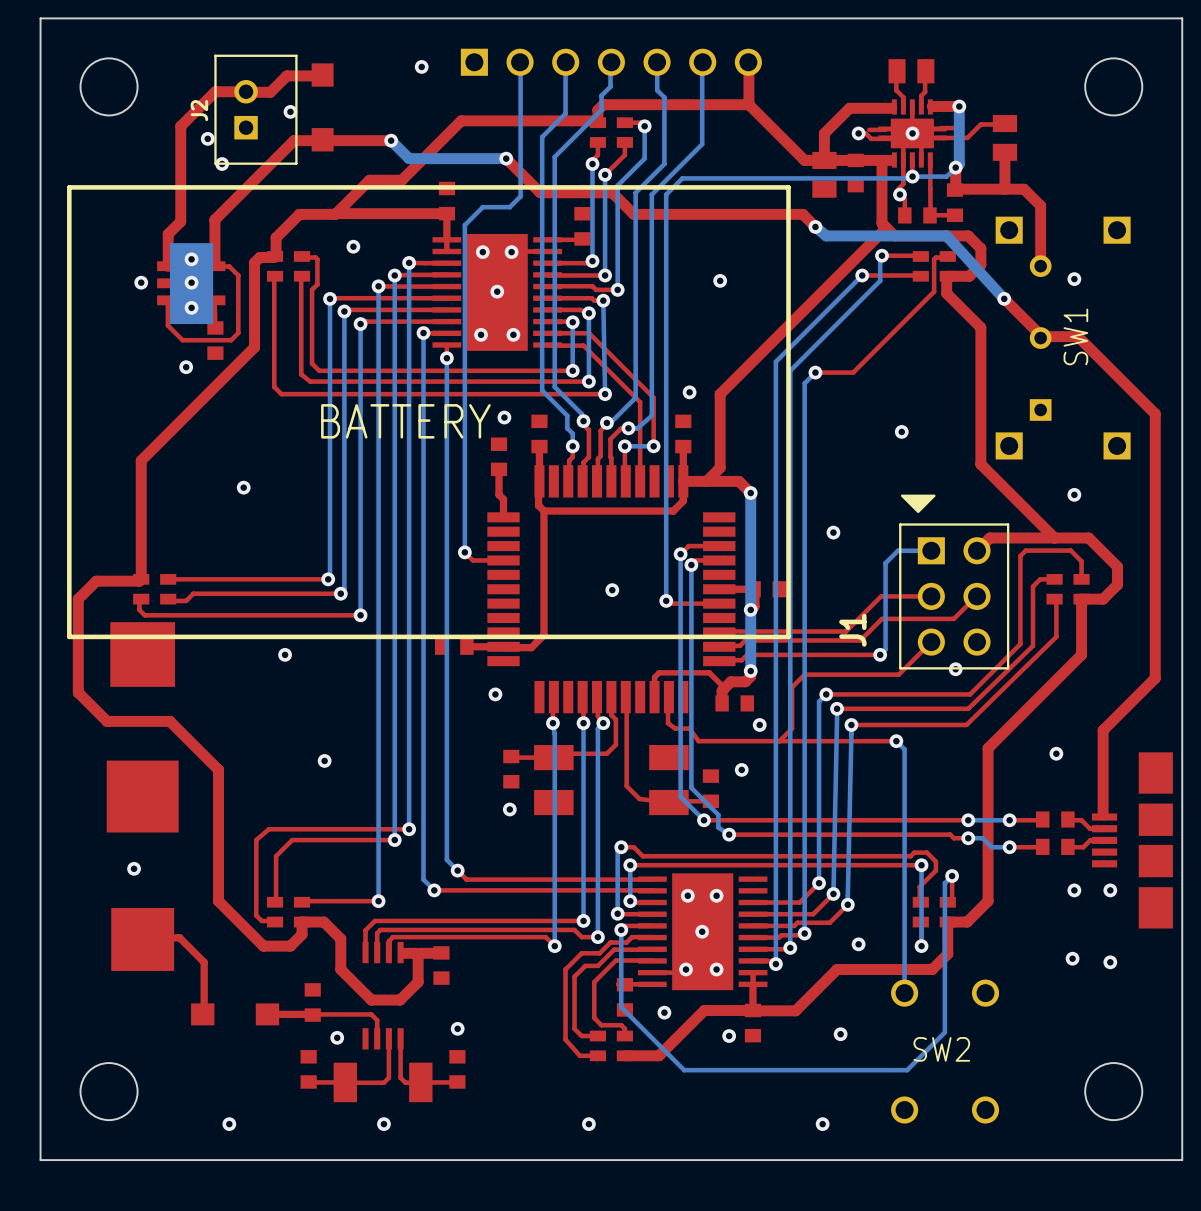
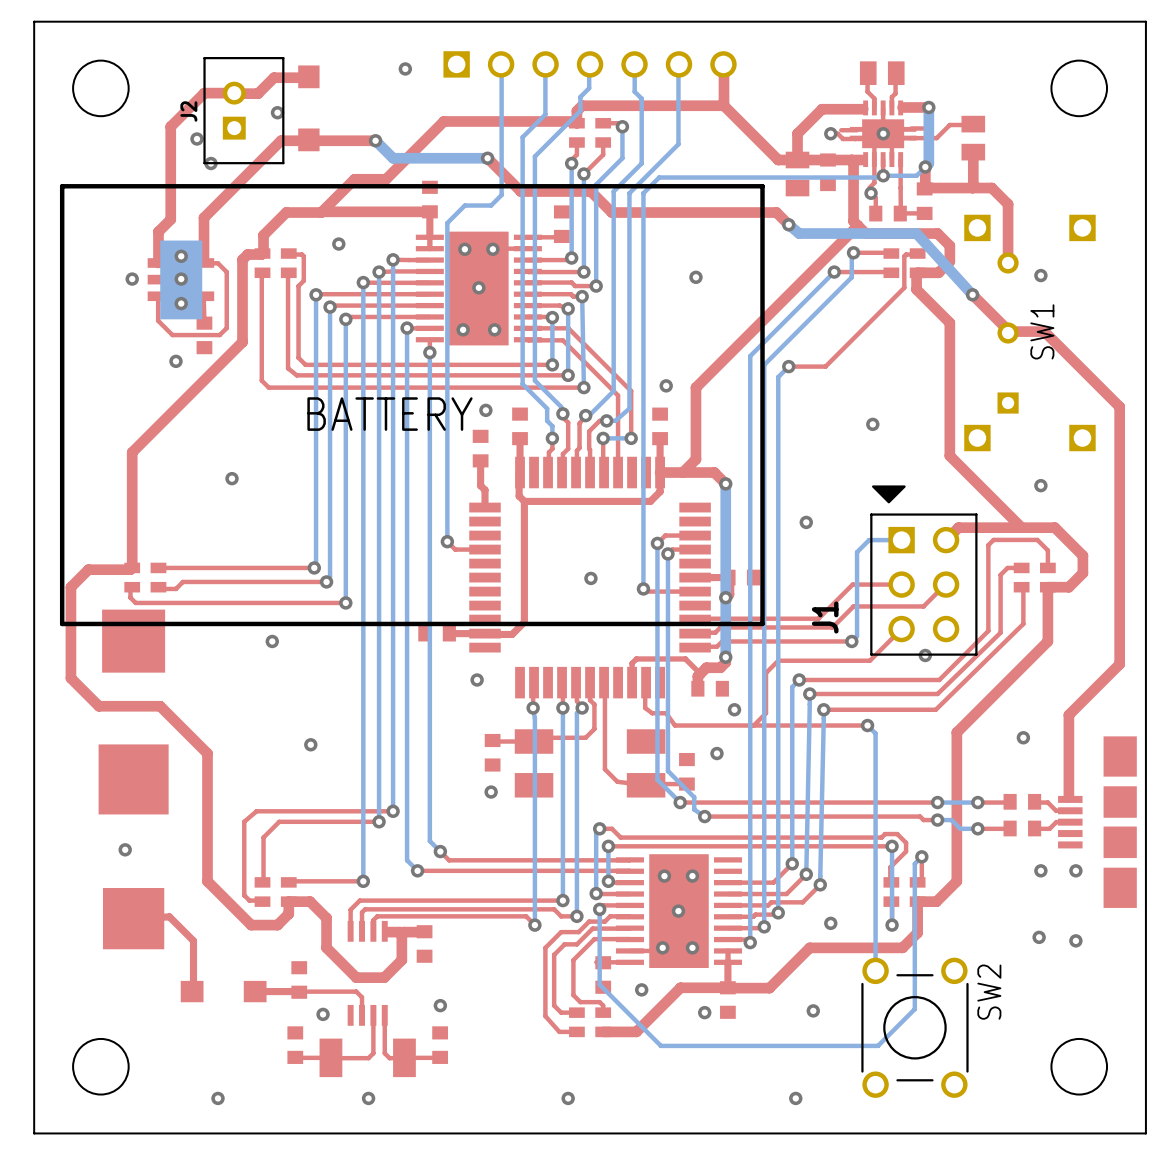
SW2 footprint: [891, 979, 1000, 1124] -> [861, 957, 969, 1098]
SW2 name position: SW2 (941, 1049) -> SW2 (989, 992)

